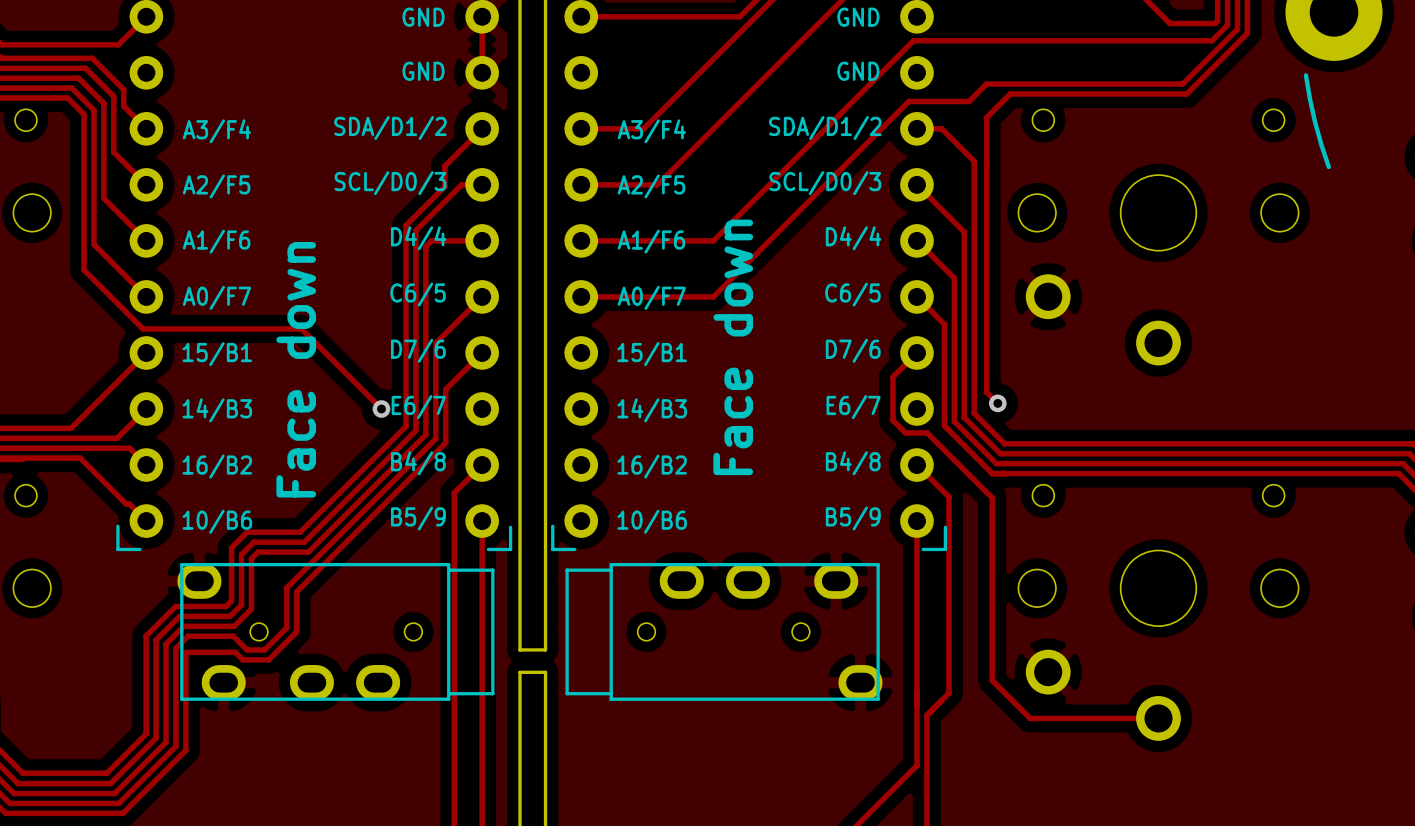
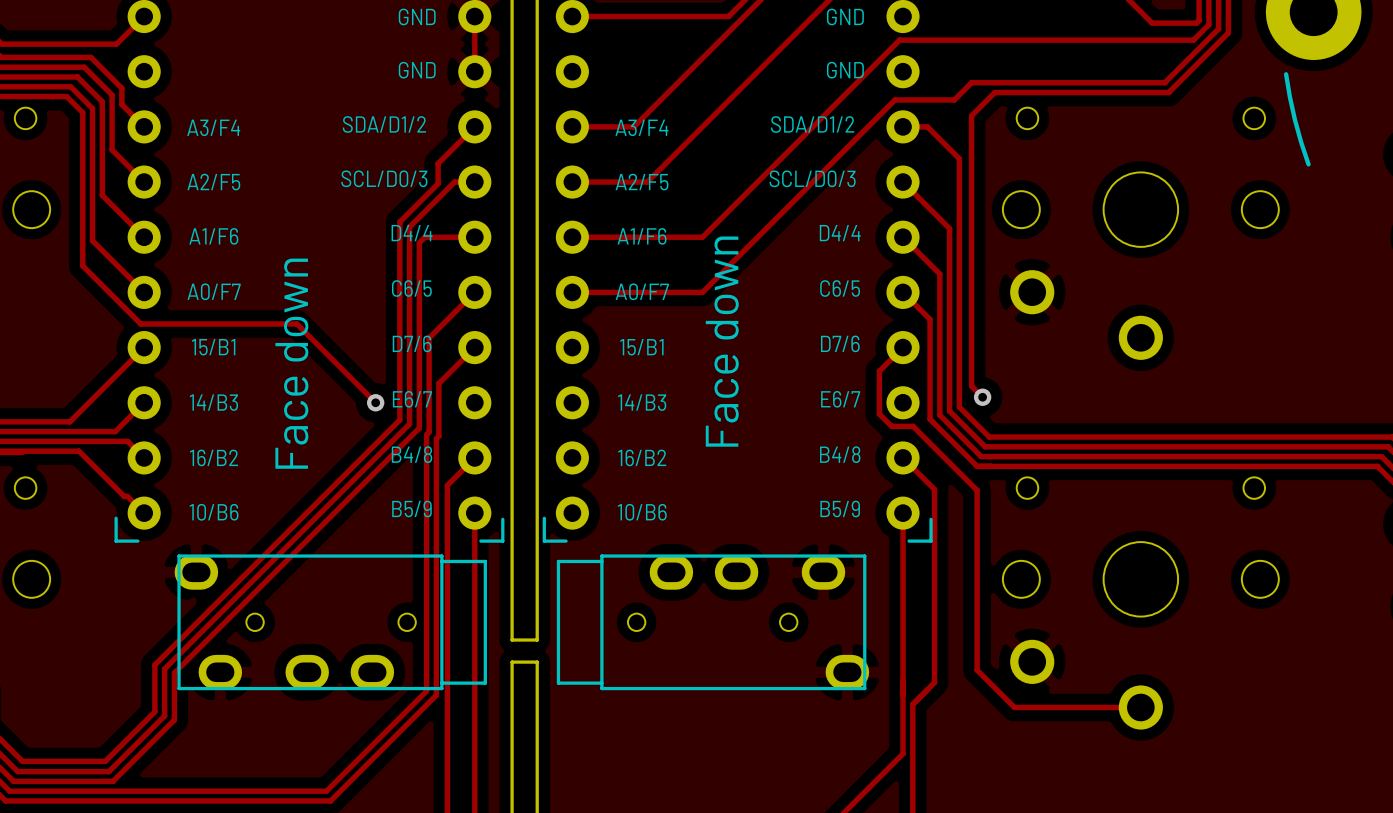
track: (433, 441) (286, 587) (286, 627) (264, 649) (247, 649) (233, 636) (187, 636) (175, 648) (175, 746) (118, 803) -> (426, 434) (426, 691) (326, 791) (116, 791)
track: (443, 445) (296, 592) (296, 632) (268, 659) (242, 659) (235, 652) (185, 652) (185, 750) (122, 813) -> (436, 438) (436, 695) (330, 800) (121, 800)
track: (300, 532) (247, 532) (231, 547) (231, 600) -> (295, 524) (228, 591)
track: (304, 542) (253, 542) (241, 554) (241, 605) -> (299, 533) (237, 595)
track: (308, 552) (258, 552) (251, 558) (251, 609) -> (303, 543) (247, 599)
track: (225, 606) (175, 606) (146, 635) (146, 733) -> (222, 597) (154, 664) (154, 711) (143, 722)
track: (230, 616) (179, 616) (156, 640) (156, 738) -> (226, 607) (164, 668) (164, 715) (153, 726)
track: (234, 626) (183, 626) (166, 644) (166, 742) -> (230, 616) (174, 673) (174, 719) (163, 730)

